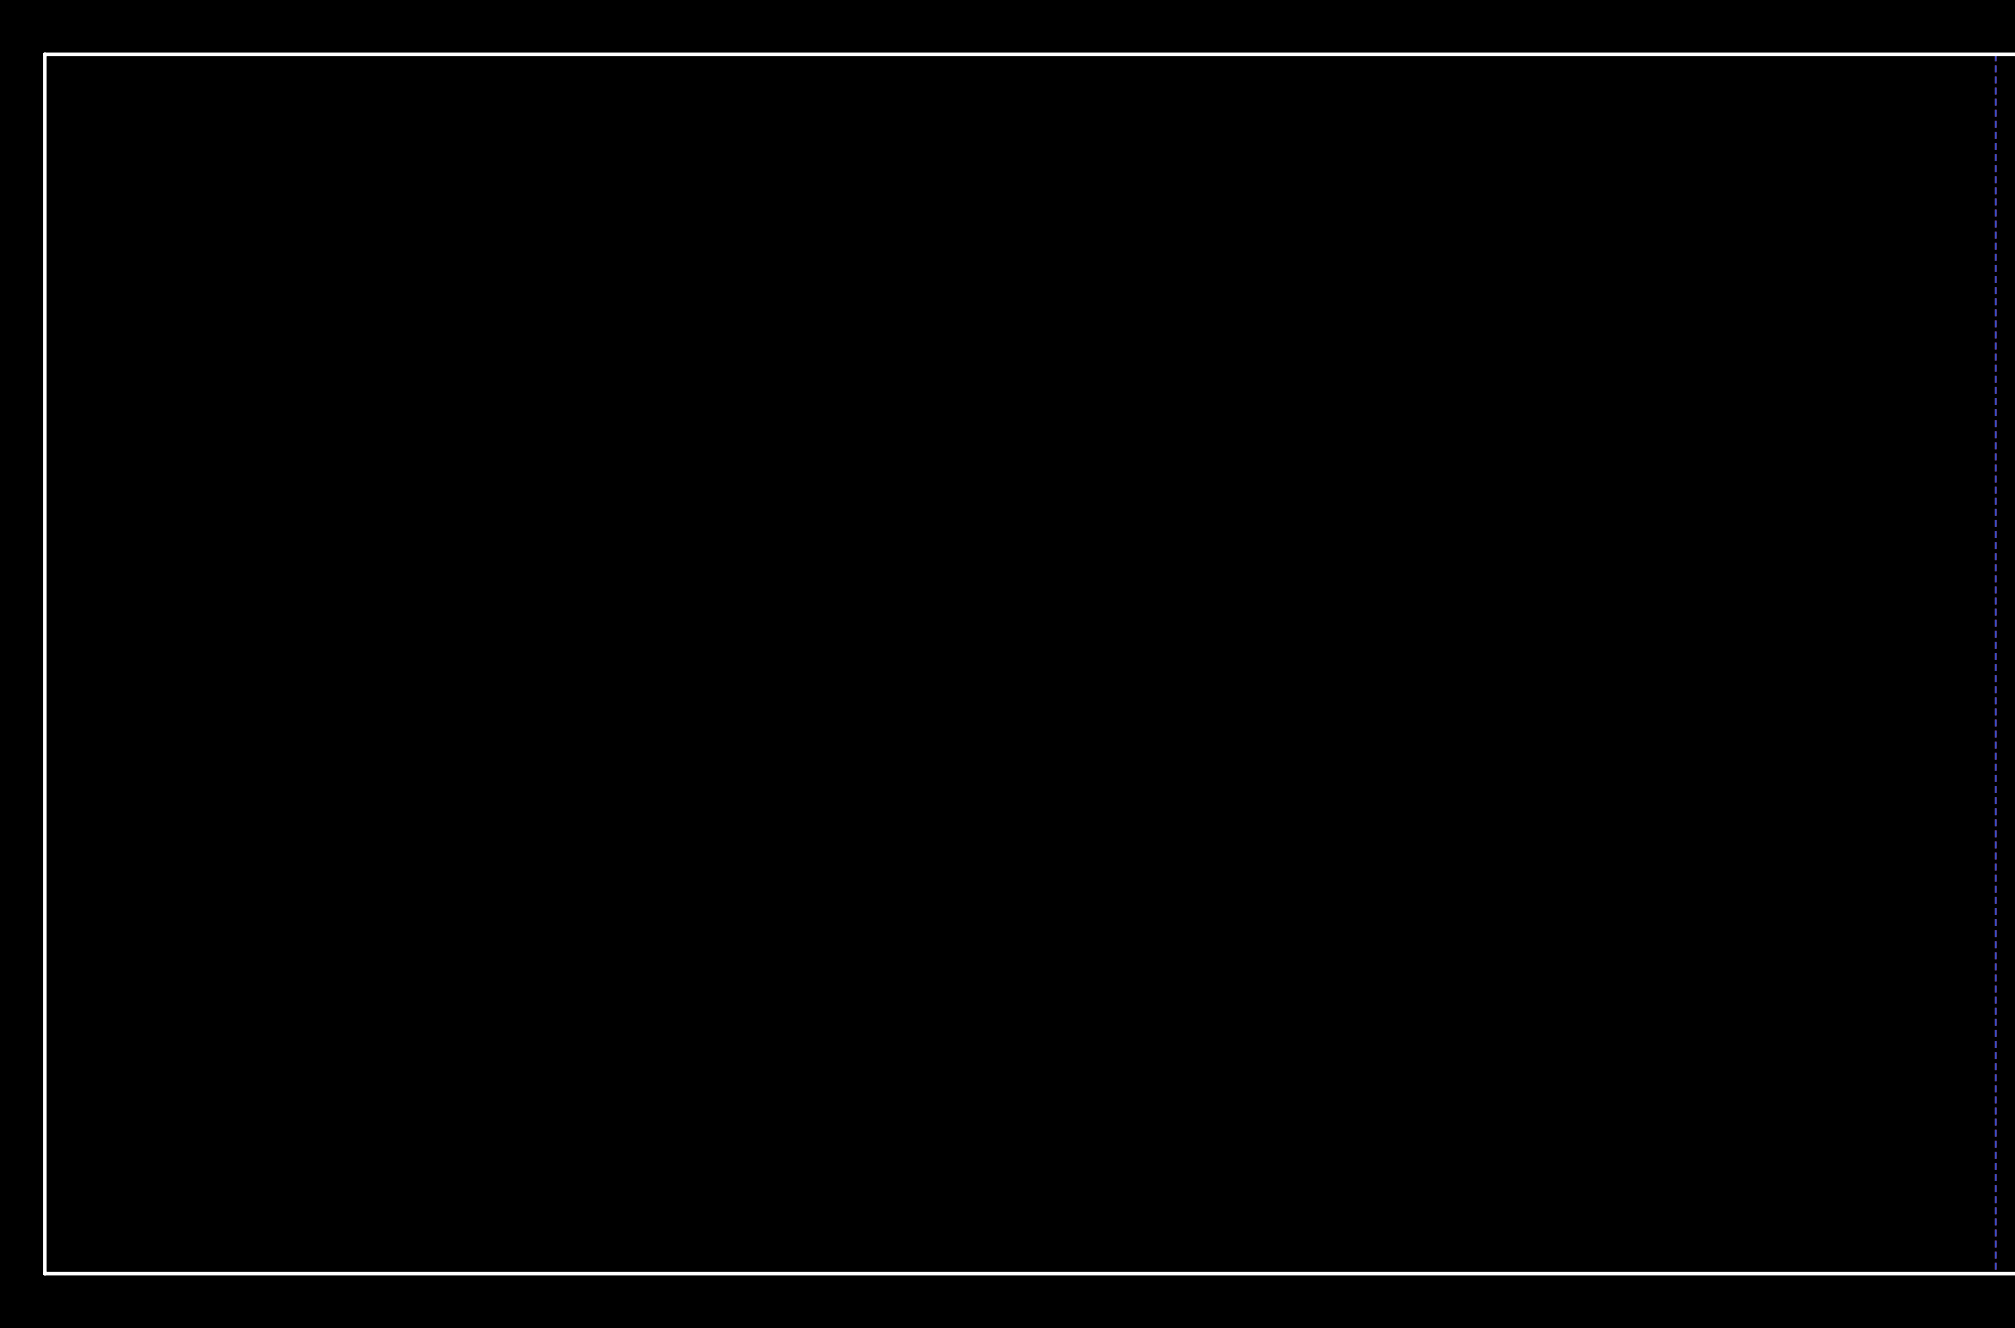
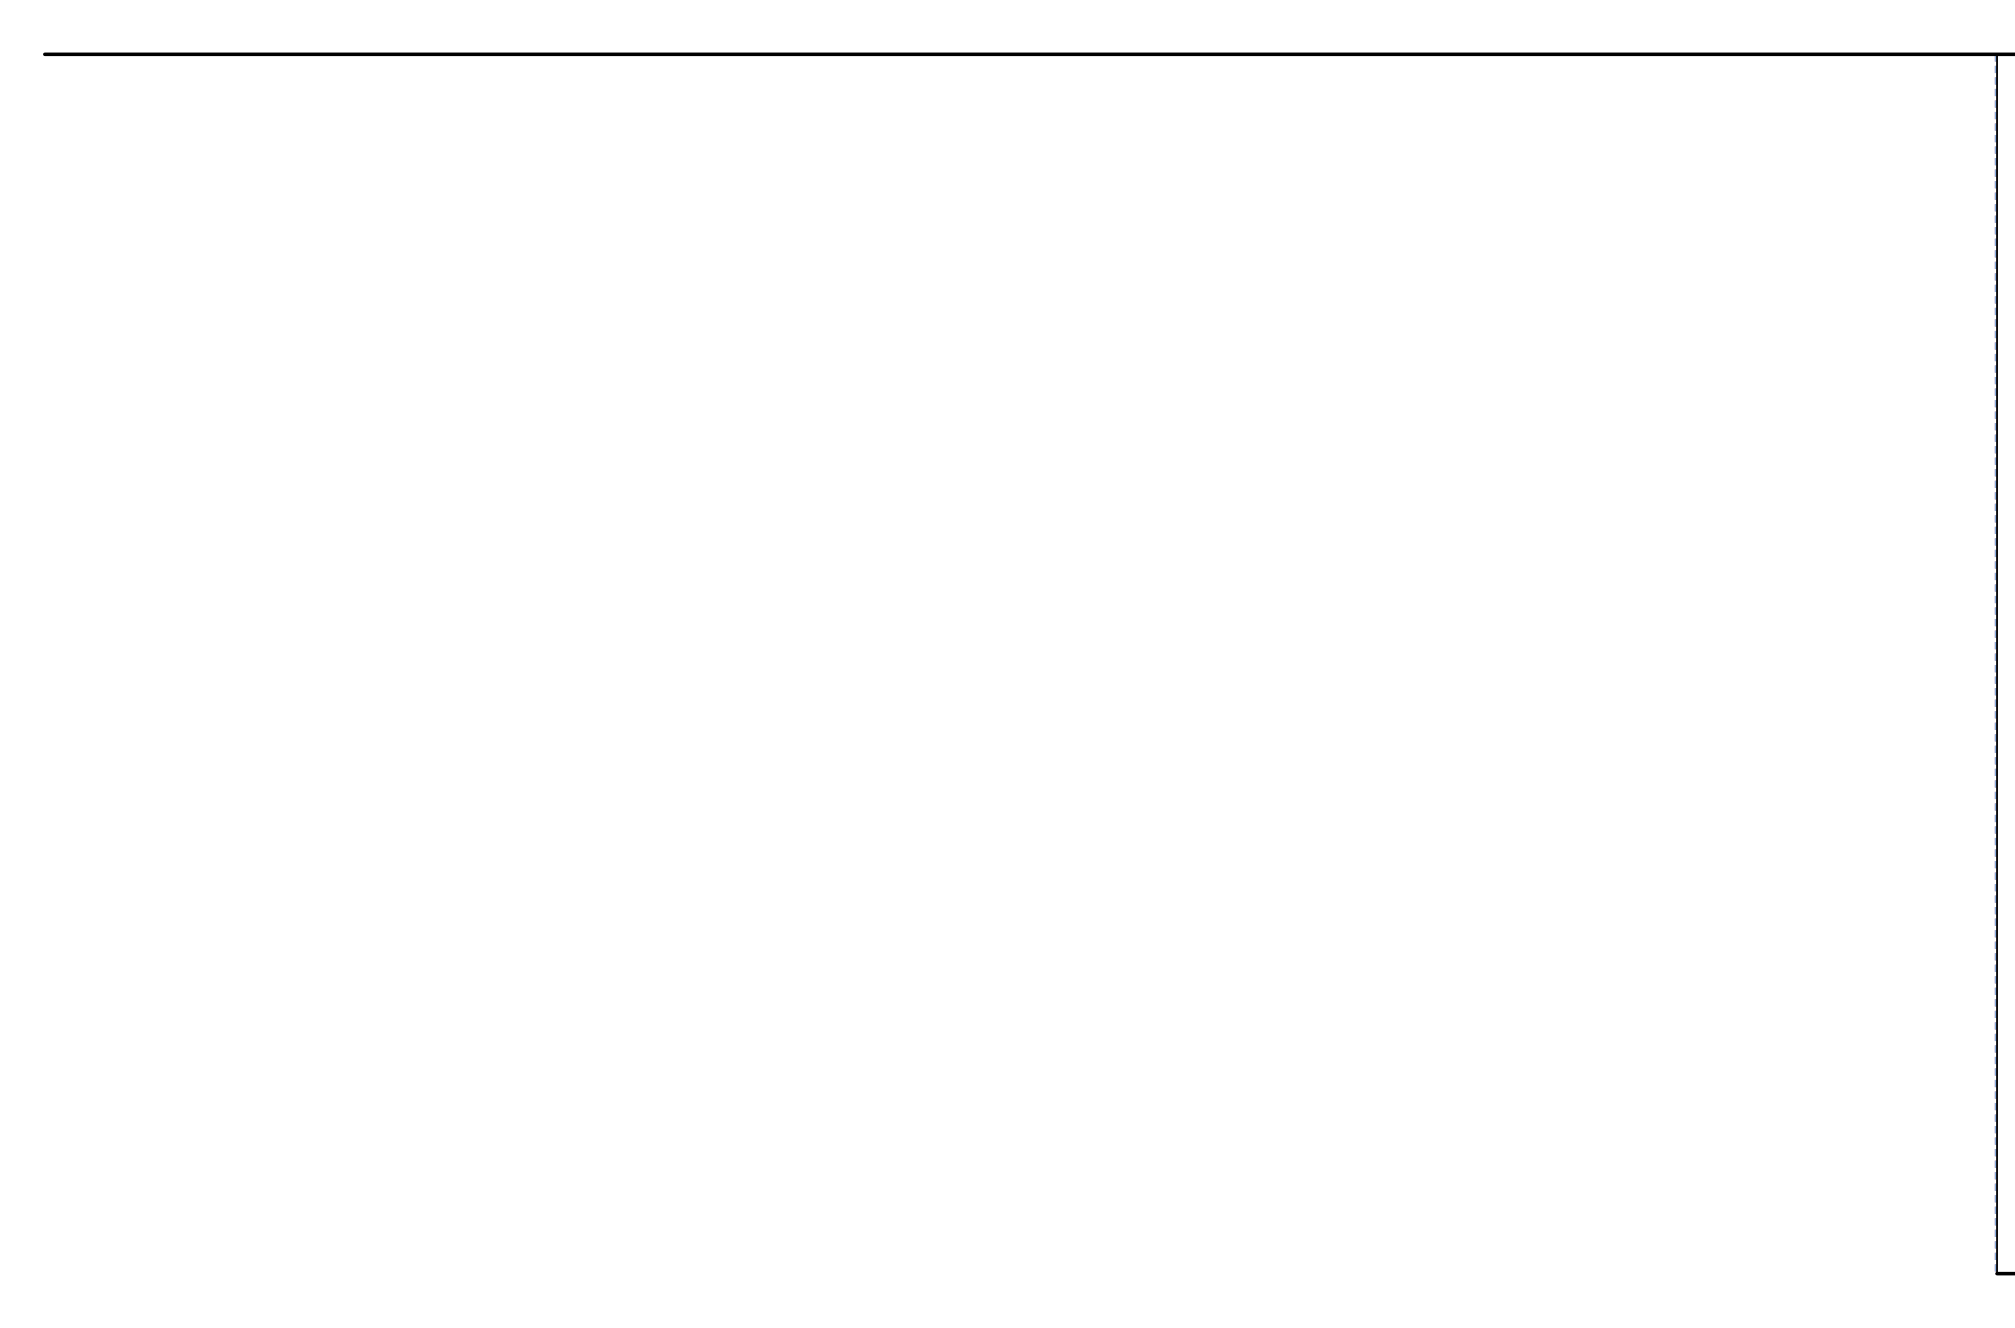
board edge: (44, 54) (44, 1273) (1997, 1273) -> (1997, 54) (1997, 1273)

